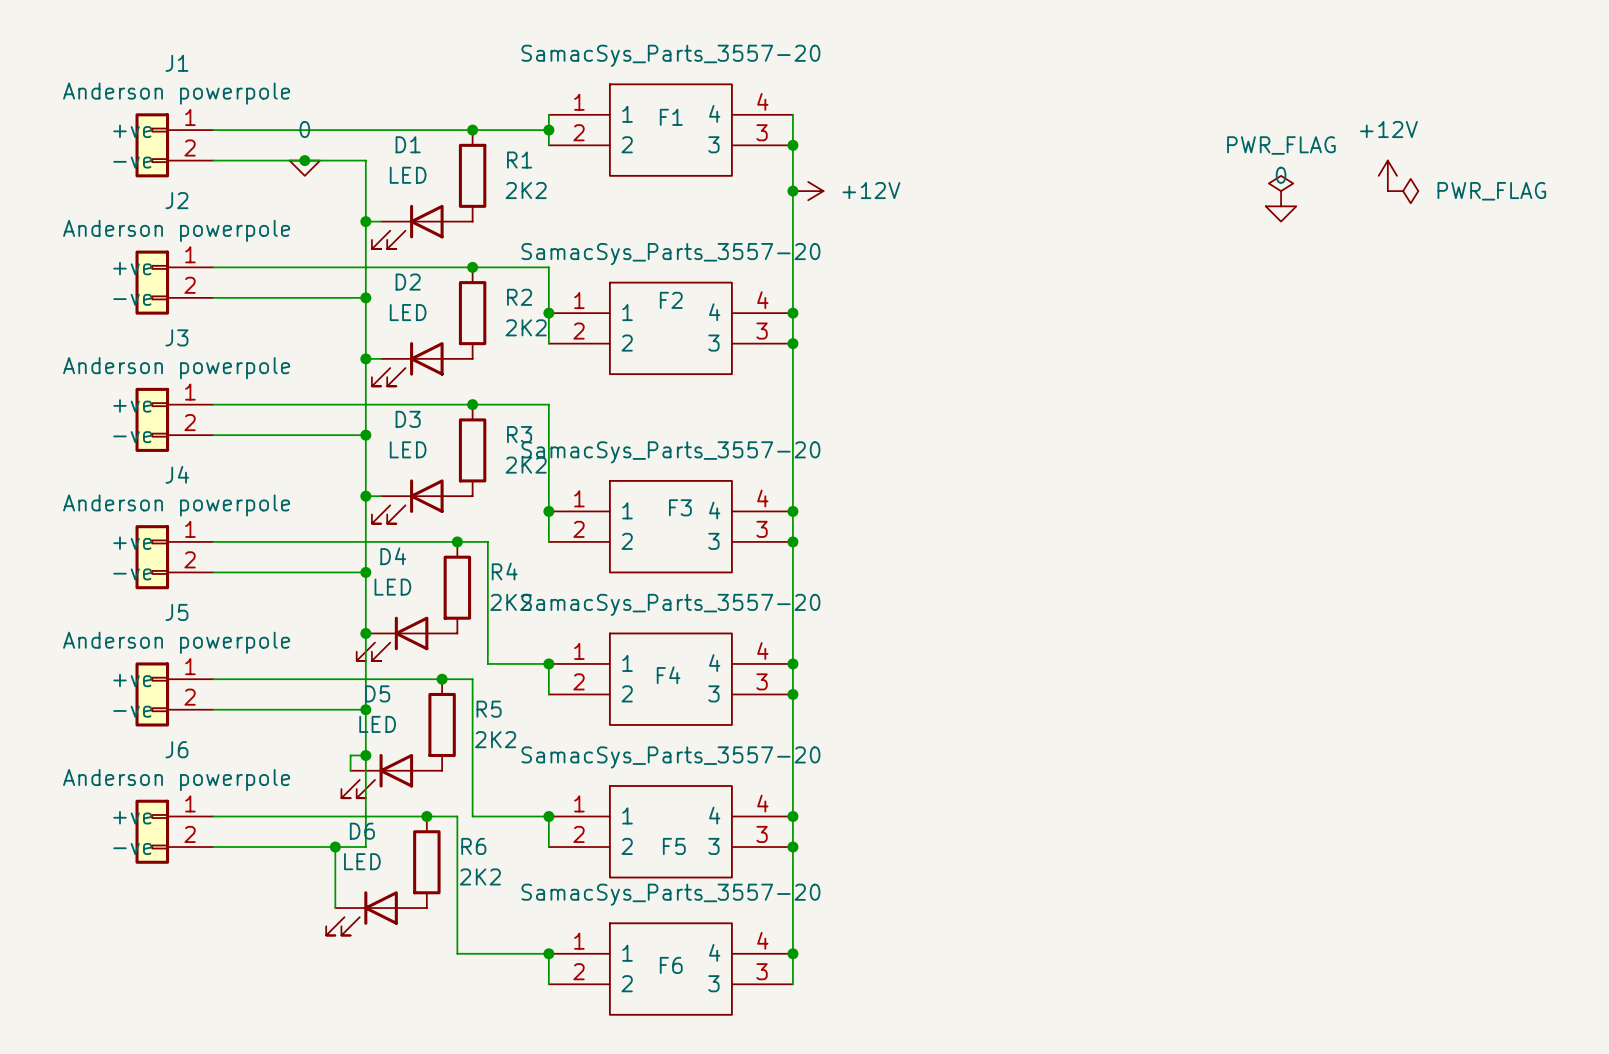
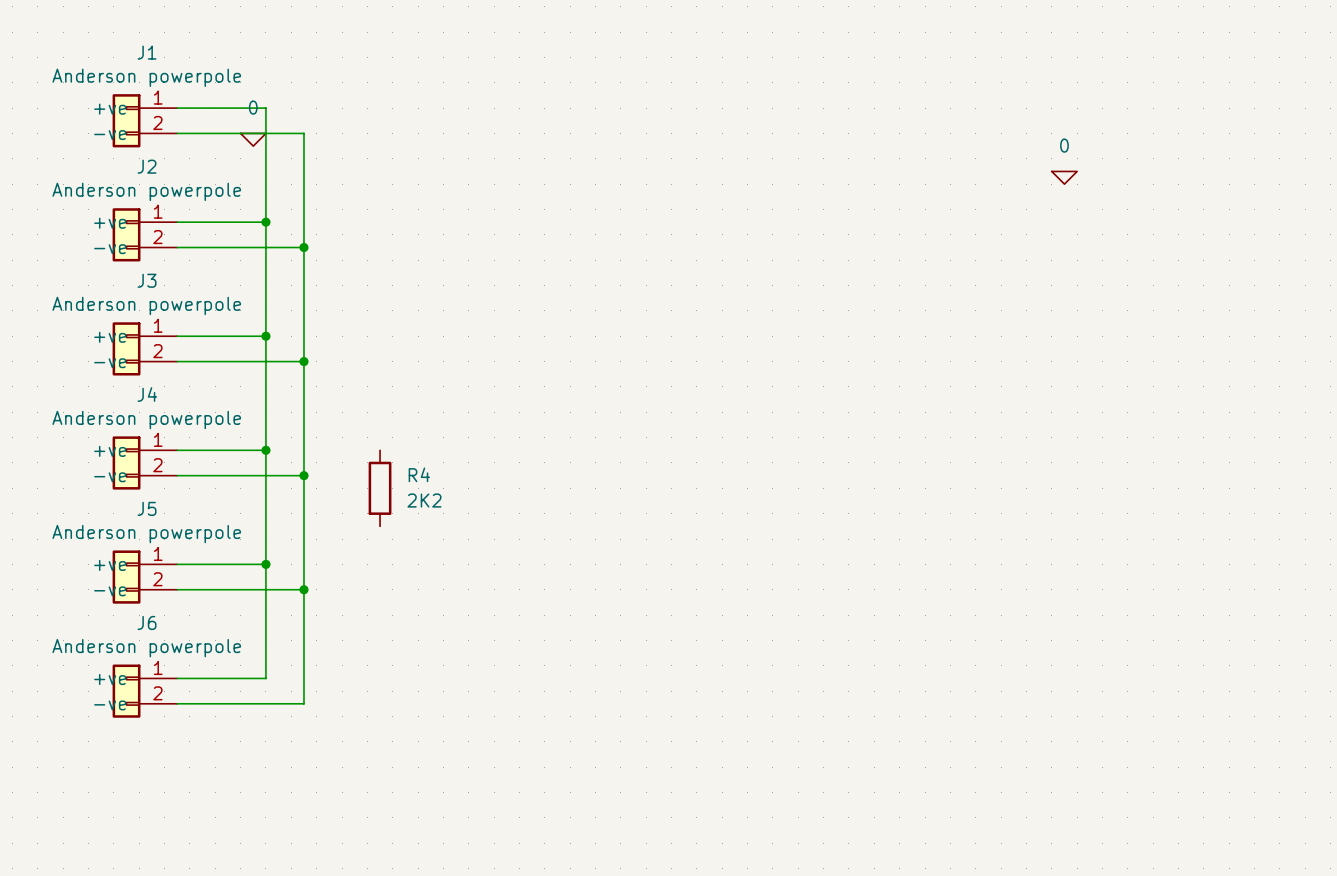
wire: (548, 114) (548, 145) -> none
wire: (792, 114) (792, 984) -> none
wire: (320, 130) (548, 130) -> (265, 108) (265, 678)
junction: (472, 130) -> none
junction: (548, 130) -> none
F1: SamacSys_Parts_3557-20 (670, 130) -> none
junction: (792, 145) -> none
junction: (304, 160) -> none
R1: 2K2 (472, 175) -> none
power symbol: +12V (1387, 175) -> none
junction: (792, 191) -> none
power symbol: +12V (808, 191) -> none
power symbol: PWR_FLAG (1281, 191) -> none
power symbol: PWR_FLAG (1403, 191) -> none
wire: (365, 221) (381, 221) -> none
junction: (365, 221) -> none
D1: LED (422, 226) -> none
wire: (320, 267) (548, 267) (548, 343) -> none
junction: none -> (265, 222)
junction: (472, 267) -> none
R2: 2K2 (472, 313) -> none
junction: (548, 313) -> none
junction: (792, 313) -> none
F2: SamacSys_Parts_3557-20 (670, 328) -> none
junction: (792, 343) -> none
wire: (365, 358) (381, 358) -> none
junction: (365, 358) -> none
D2: LED (422, 364) -> none
wire: (320, 404) (548, 404) (548, 541) -> none
junction: none -> (265, 336)
junction: (472, 404) -> none
R3: 2K2 (472, 450) -> none
wire: (365, 496) (381, 496) -> none
junction: (365, 496) -> none
D3: LED (422, 501) -> none
junction: (548, 511) -> none
junction: (792, 511) -> none
F3: SamacSys_Parts_3557-20 (670, 526) -> none
wire: (320, 541) (487, 541) (487, 663) (548, 663) (548, 694) -> none
junction: none -> (265, 450)
junction: (457, 541) -> none
junction: (792, 541) -> none
junction: (365, 633) -> none
D4: LED (407, 638) -> none
junction: (548, 663) -> none
junction: (792, 663) -> none
wire: (320, 679) (472, 679) (472, 816) (548, 816) (548, 847) -> none
junction: none -> (265, 564)
junction: (442, 679) -> none
F4: SamacSys_Parts_3557-20 (670, 679) -> none
junction: (792, 694) -> none
R5: 2K2 (442, 724) -> none
wire: (365, 755) (350, 755) (350, 770) -> none
junction: (365, 755) -> none
D5: LED (391, 776) -> none
wire: (320, 816) (457, 816) (457, 953) (548, 953) (548, 984) -> none
junction: (426, 816) -> none
junction: (548, 816) -> none
junction: (792, 816) -> none
F5: SamacSys_Parts_3557-20 (670, 831) -> none
wire: (335, 847) (335, 908) -> none
junction: (335, 847) -> none
junction: (792, 847) -> none
R6: 2K2 (426, 862) -> none
D6: LED (376, 913) -> none
junction: (548, 953) -> none
junction: (792, 953) -> none
F6: SamacSys_Parts_3557-20 (670, 969) -> none

